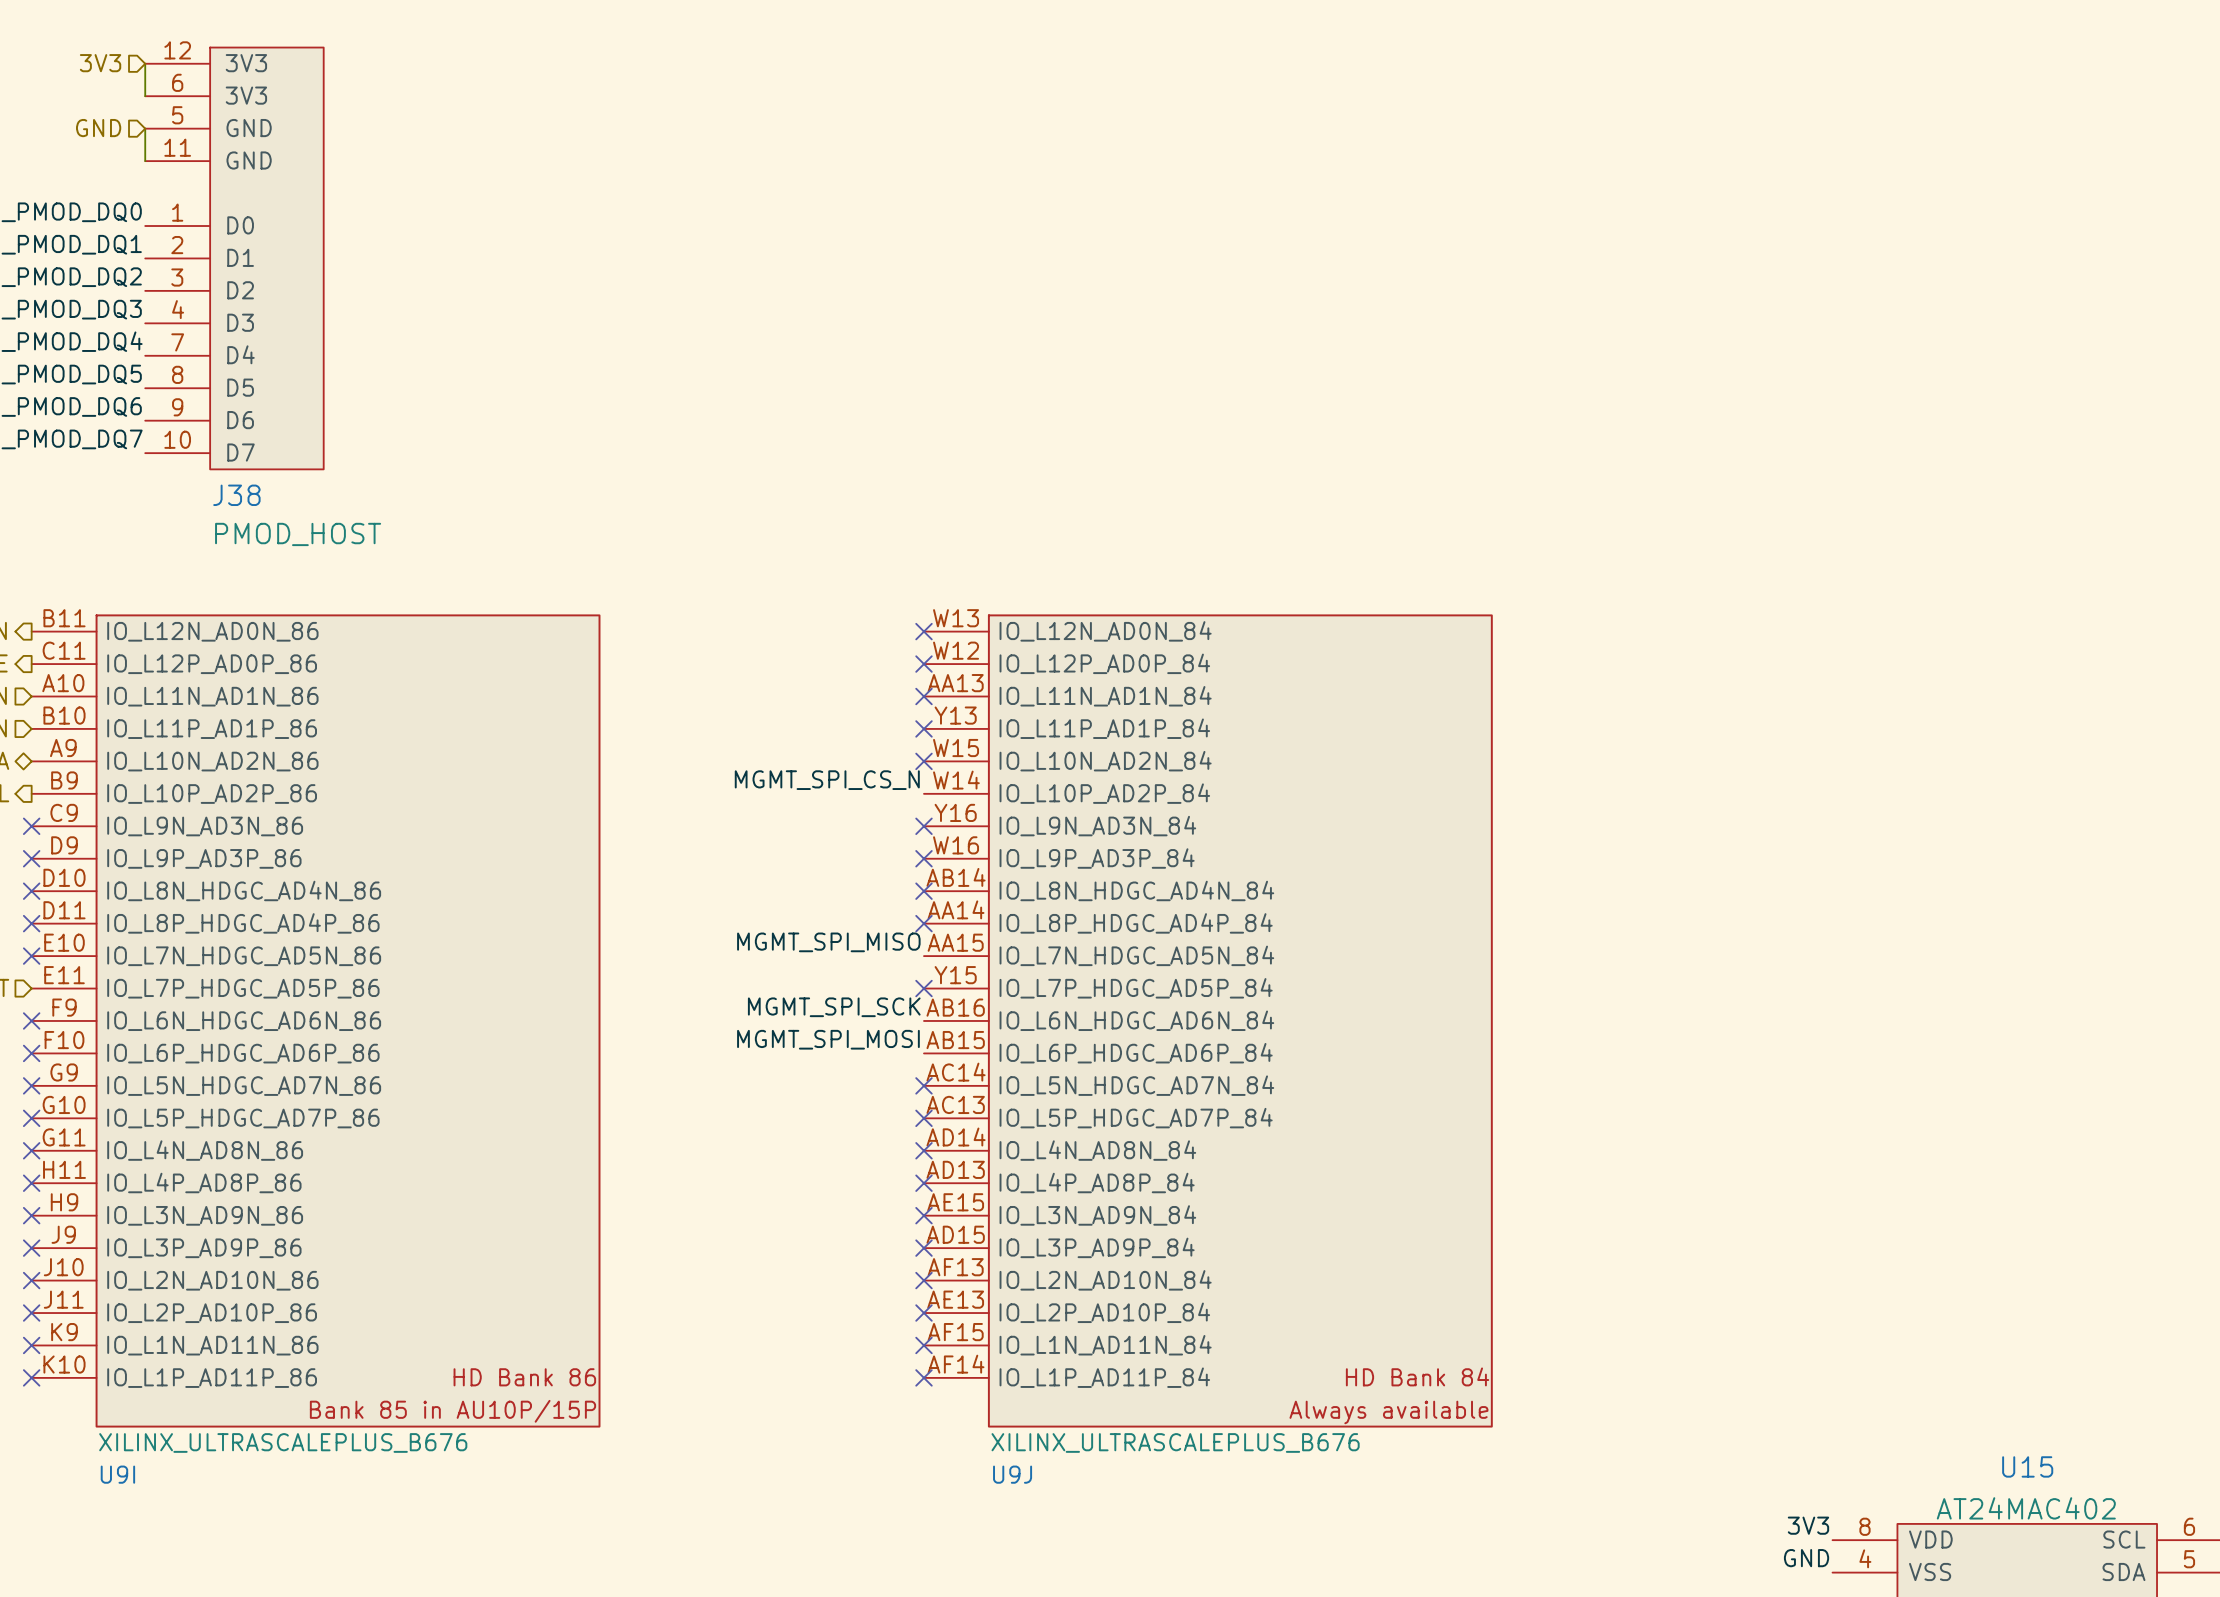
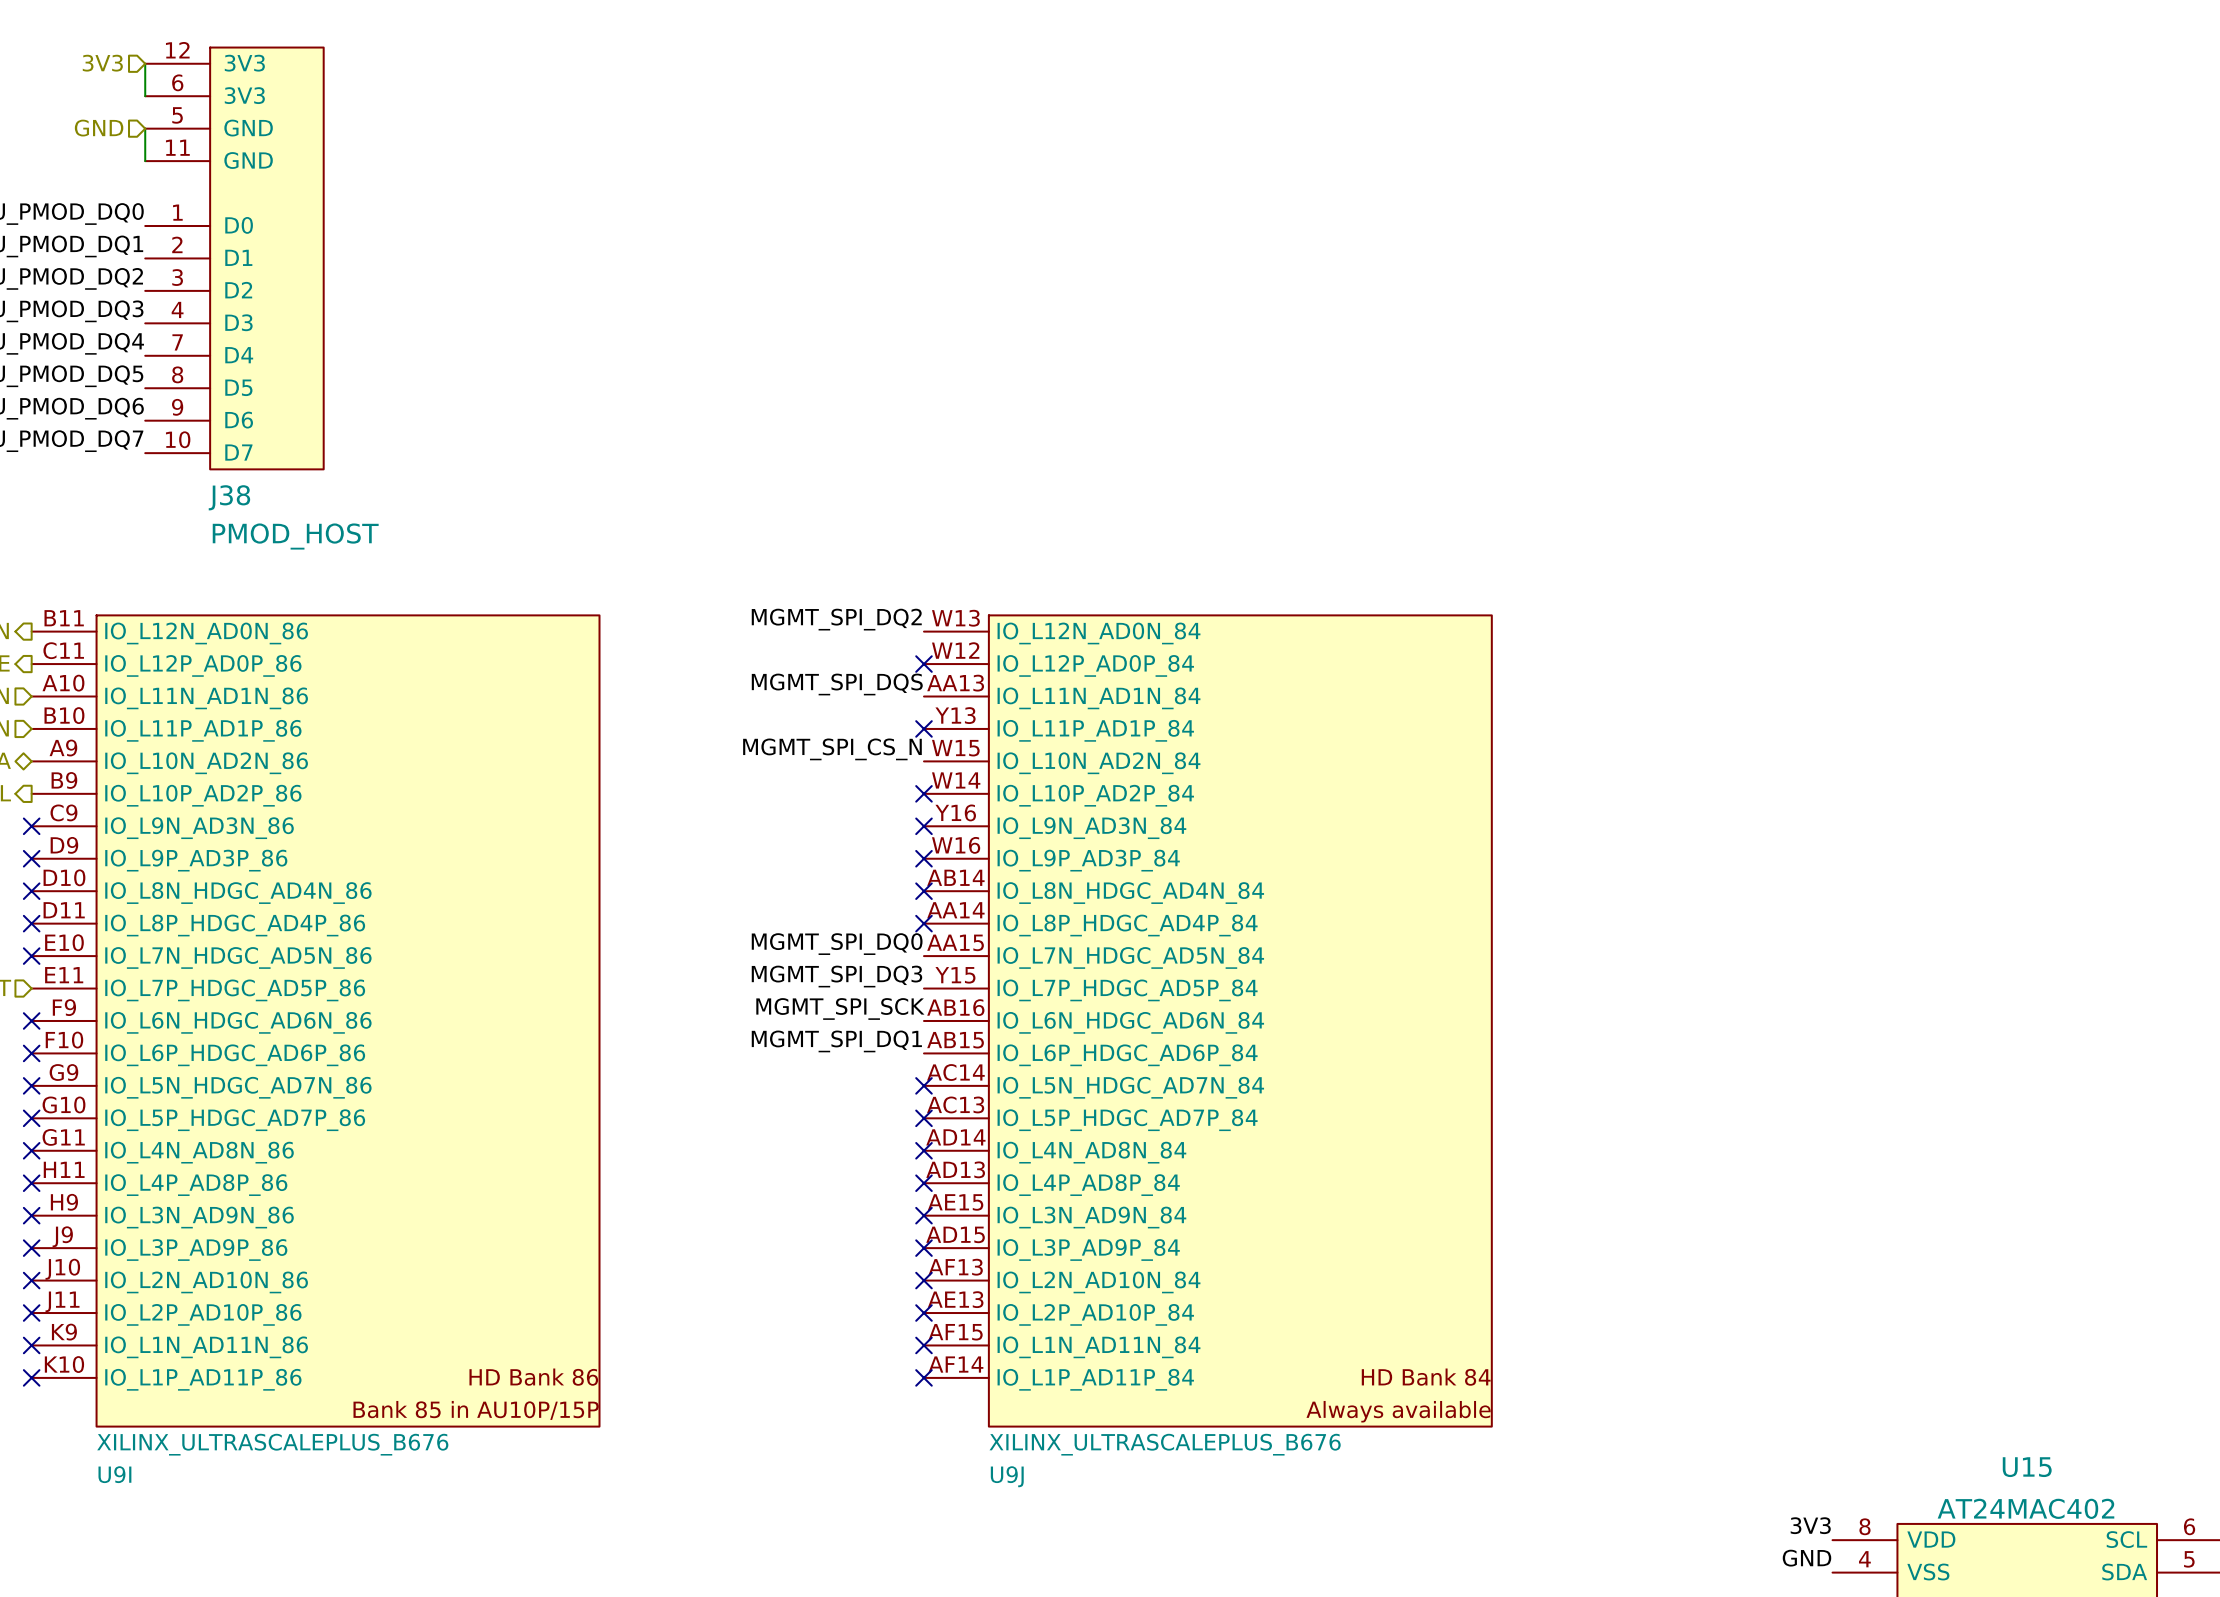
label: none -> MGMT_SPI_DQ2 (836, 619)
no-connect mark: (923, 631) -> none
label: none -> MGMT_SPI_DQS (837, 684)
no-connect mark: (923, 696) -> none
no-connect mark position: (923, 761) -> (923, 793)
label position: MGMT_SPI_CS_N (827, 780) -> MGMT_SPI_CS_N (832, 749)
label: MGMT_SPI_MISO (828, 942) -> MGMT_SPI_DQ0 (837, 944)
label: none -> MGMT_SPI_DQ3 (836, 976)
no-connect mark: (923, 988) -> none
label: MGMT_SPI_MOSI (828, 1039) -> MGMT_SPI_DQ1 (836, 1041)

